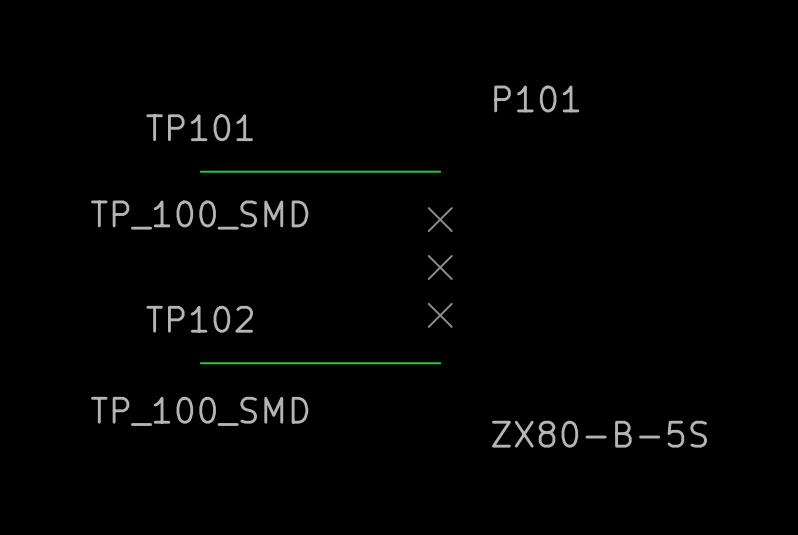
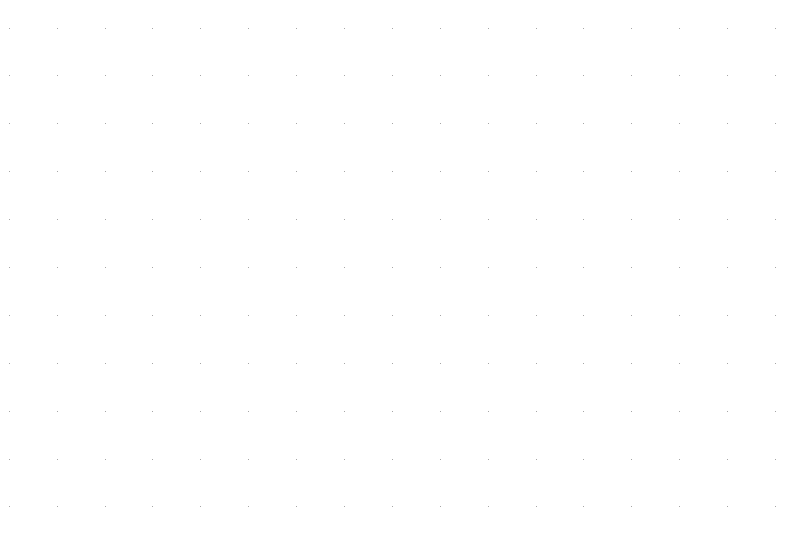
TP101: TP_100_SMD (199, 171) -> none
wire: (200, 171) (440, 171) -> none
no-connect mark: (440, 219) -> none
P101: ZX80-B-5S (599, 266) -> none
no-connect mark: (440, 267) -> none
no-connect mark: (440, 315) -> none
wire: (200, 363) (440, 363) -> none
TP102: TP_100_SMD (199, 365) -> none

